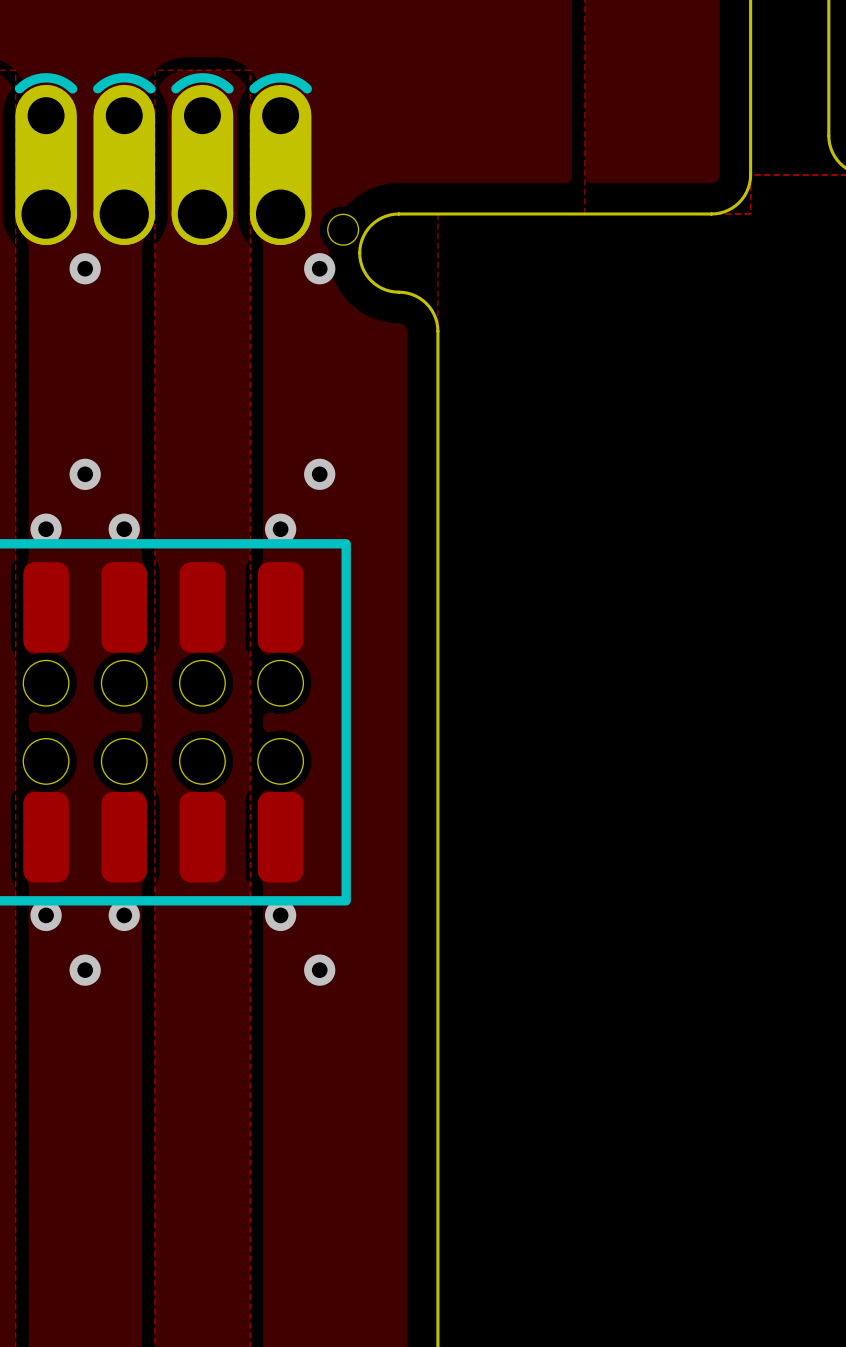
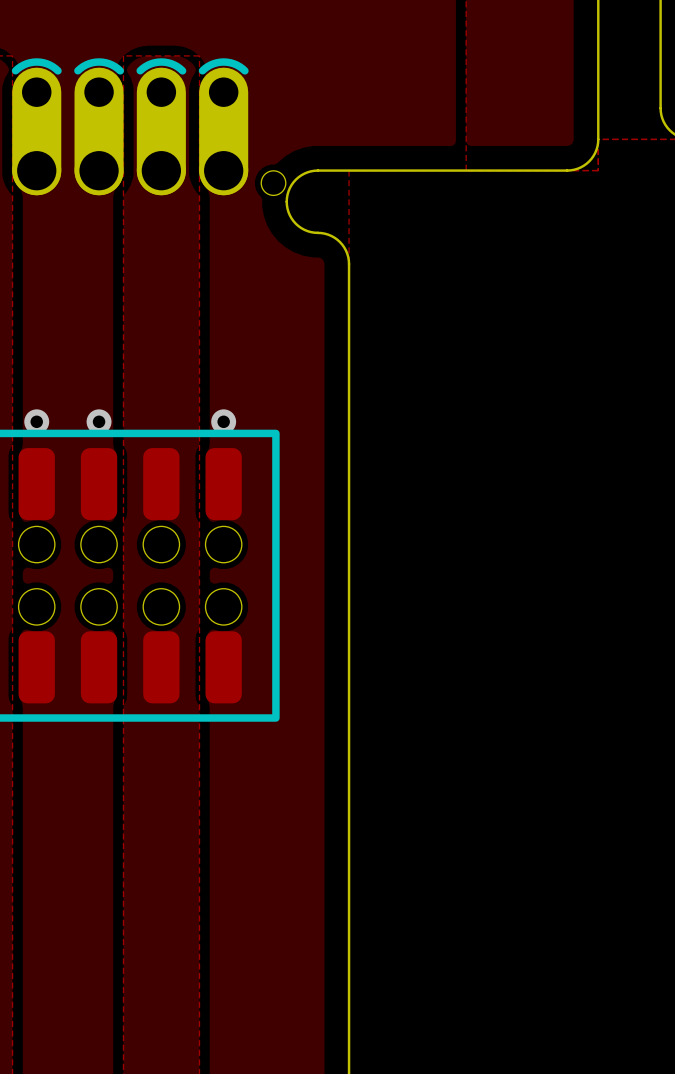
via: (85, 268) -> none
via: (319, 268) -> none
via: (85, 474) -> none
via: (319, 474) -> none
via: (46, 915) -> none
via: (124, 915) -> none
via: (280, 915) -> none
via: (85, 970) -> none
via: (319, 970) -> none

